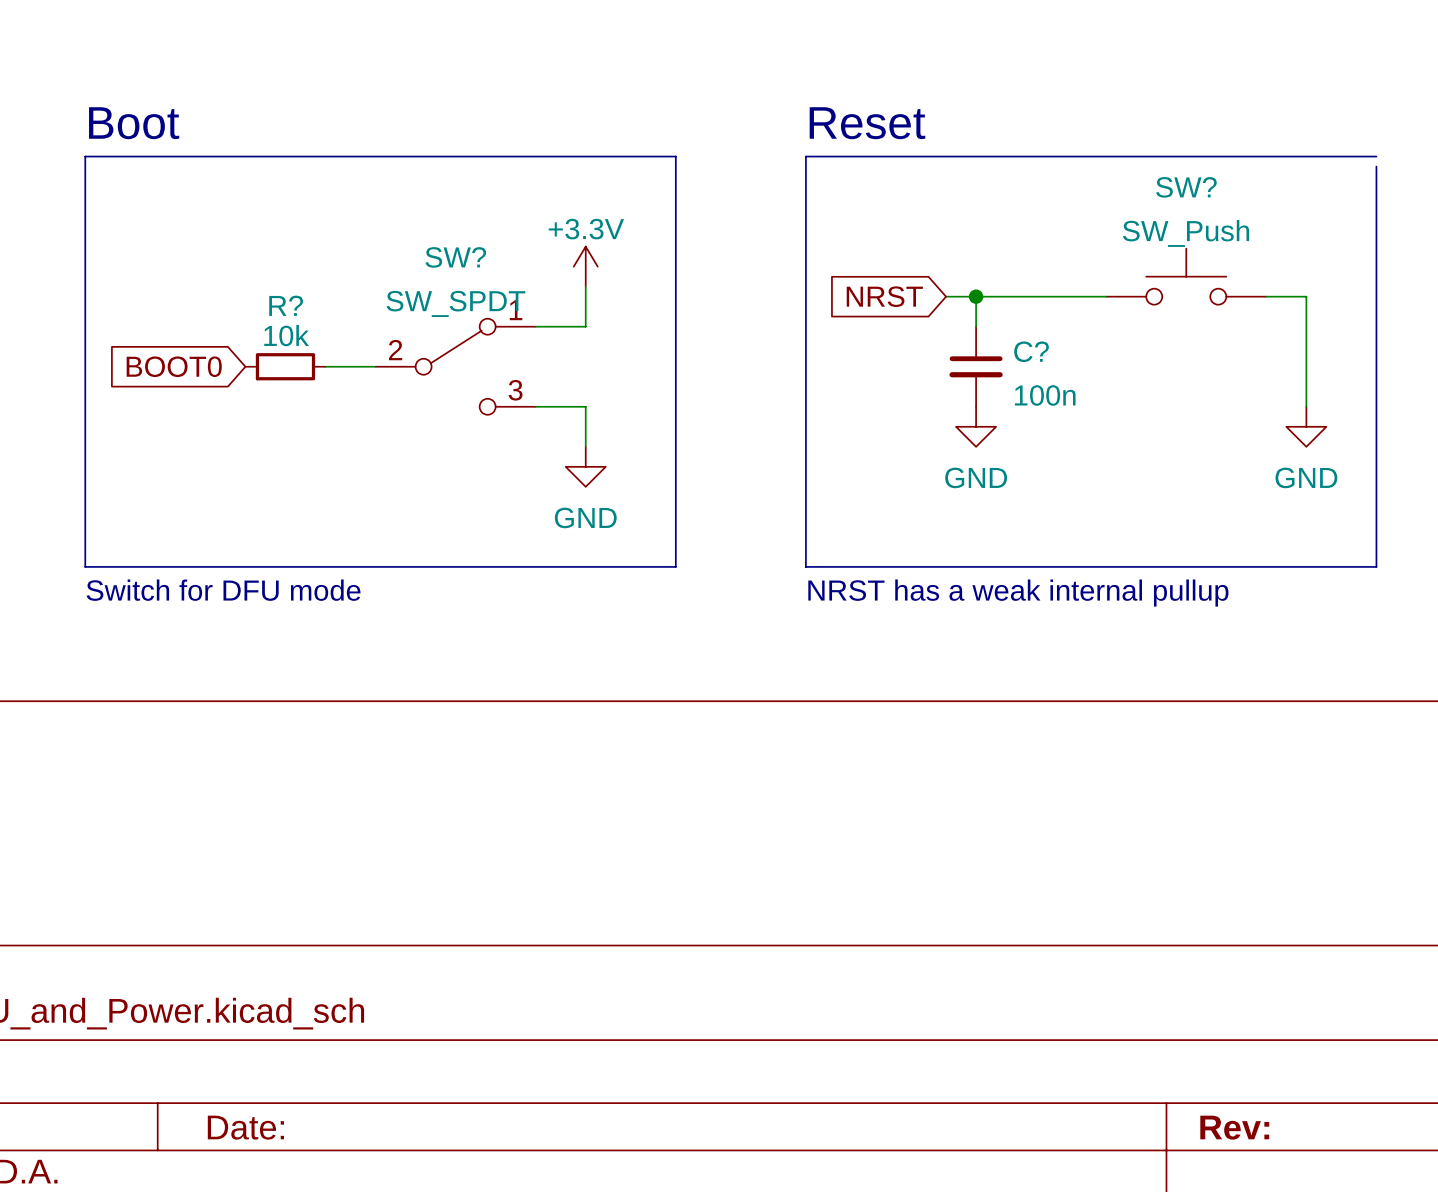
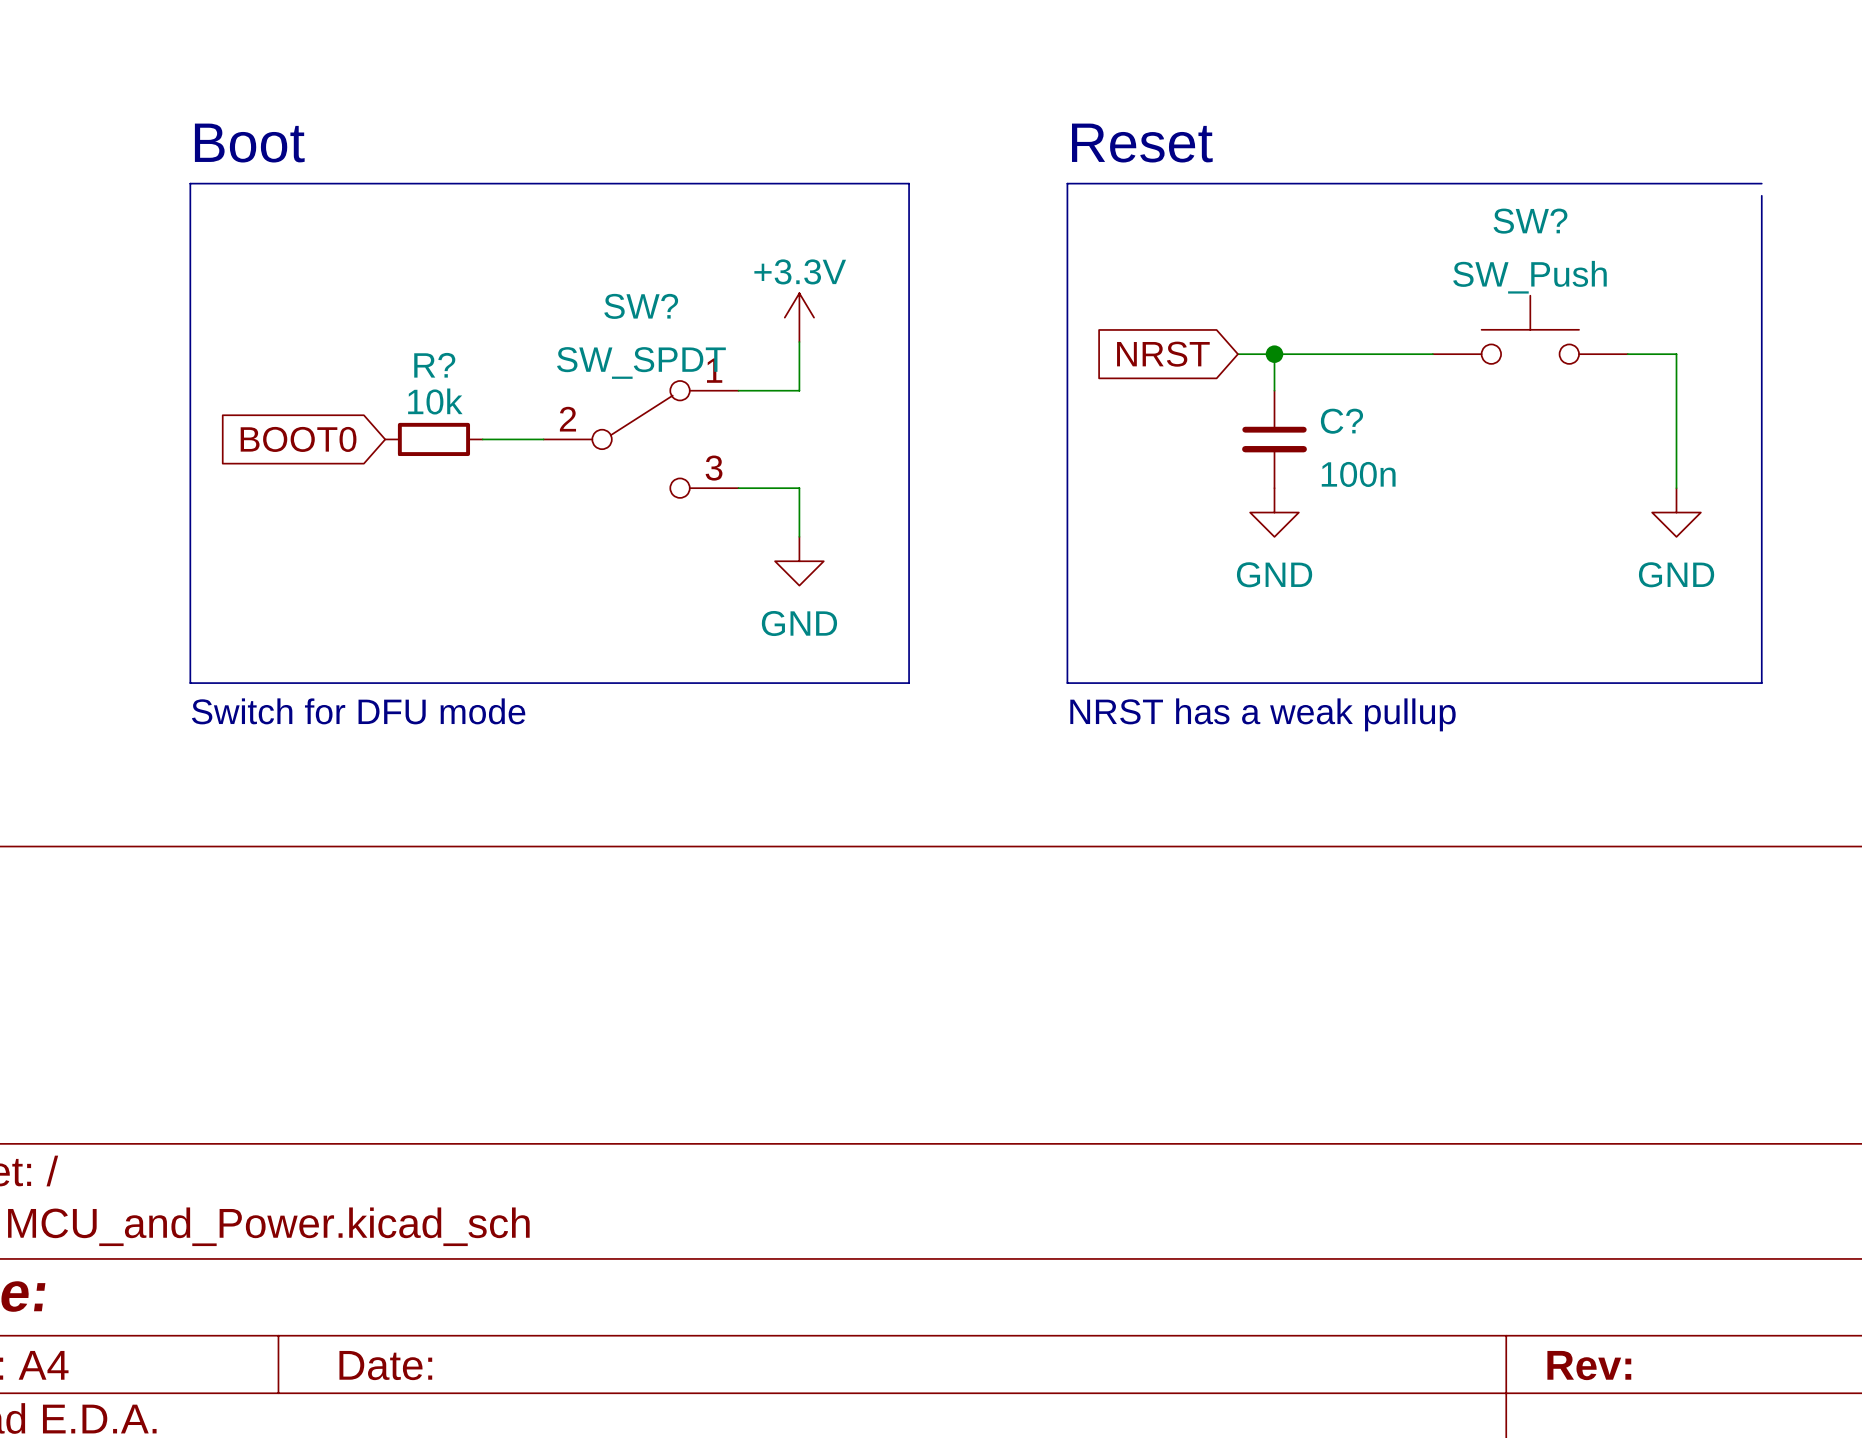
text: NRST has a weak internal pullup (1018, 593) -> NRST has a weak pullup (1262, 714)

